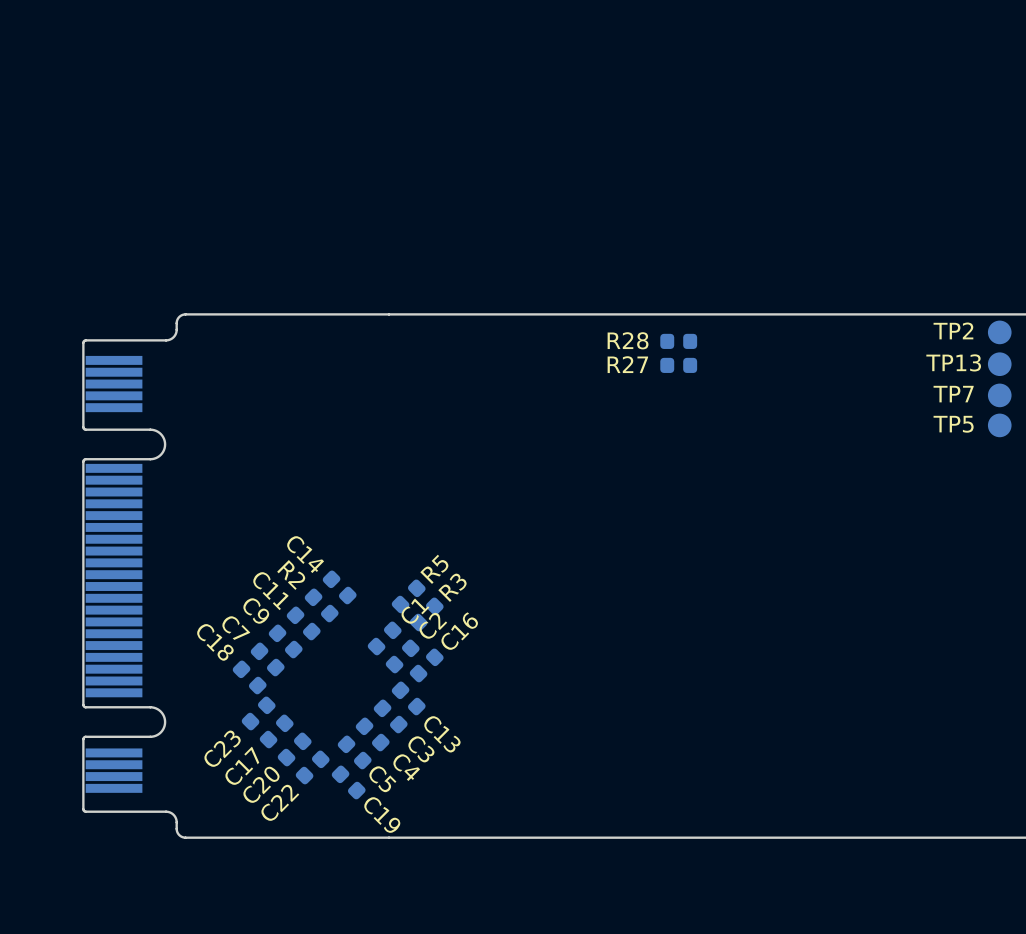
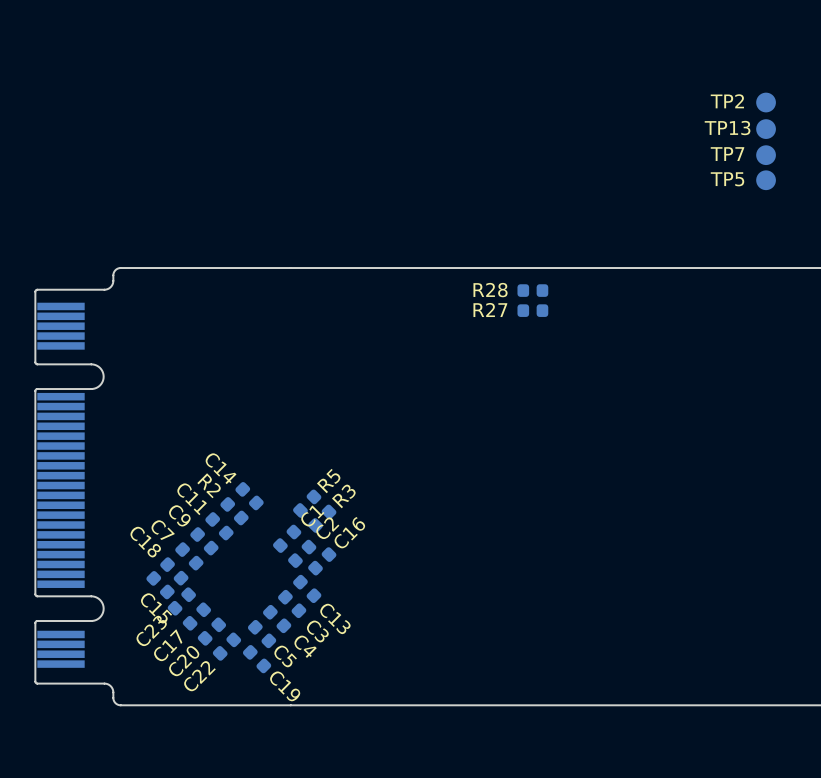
TP2 position: (999, 332) -> (766, 102)
TP13 position: (999, 364) -> (766, 129)
TP7 position: (999, 395) -> (766, 155)
TP5 position: (999, 425) -> (766, 180)
C15: none -> (160, 585)

